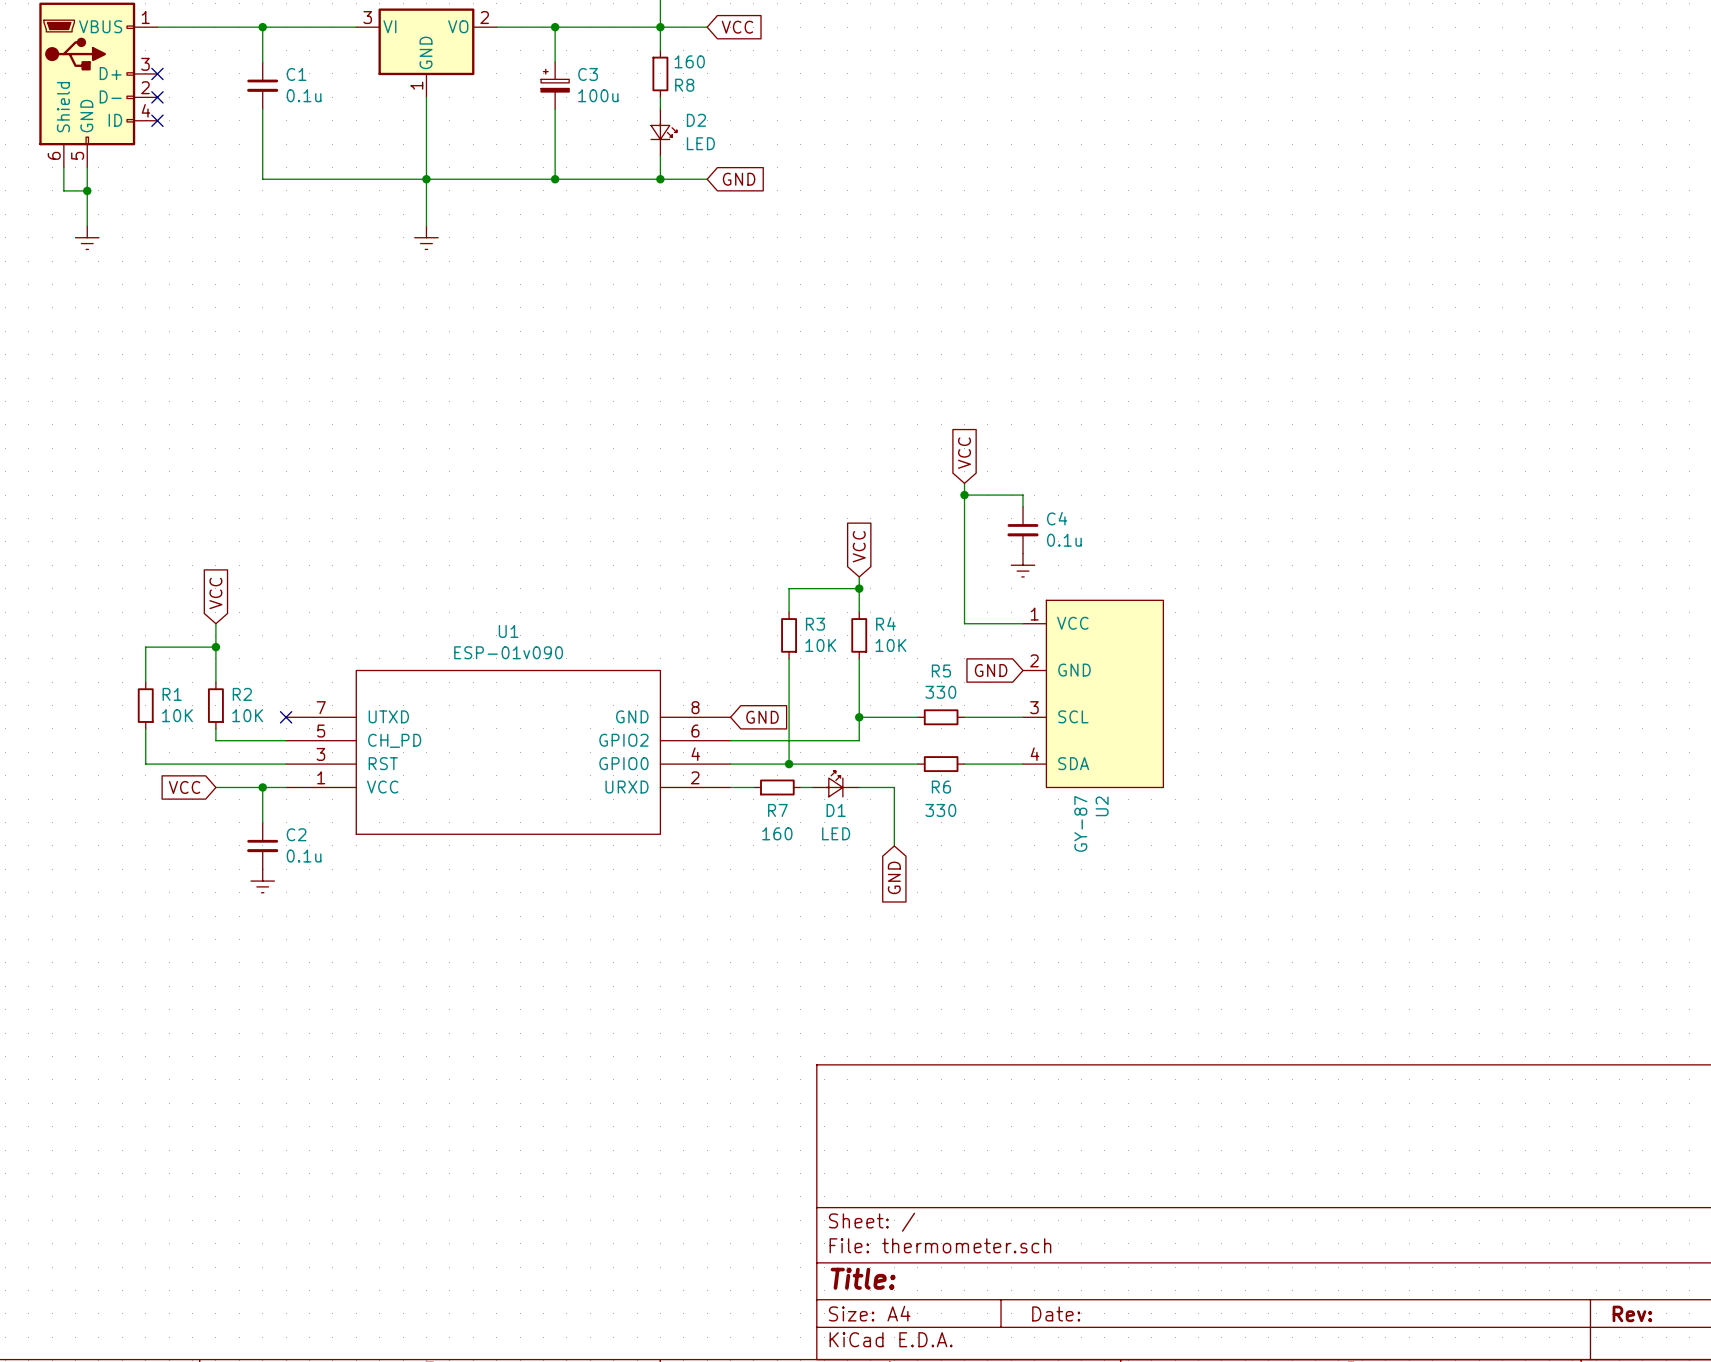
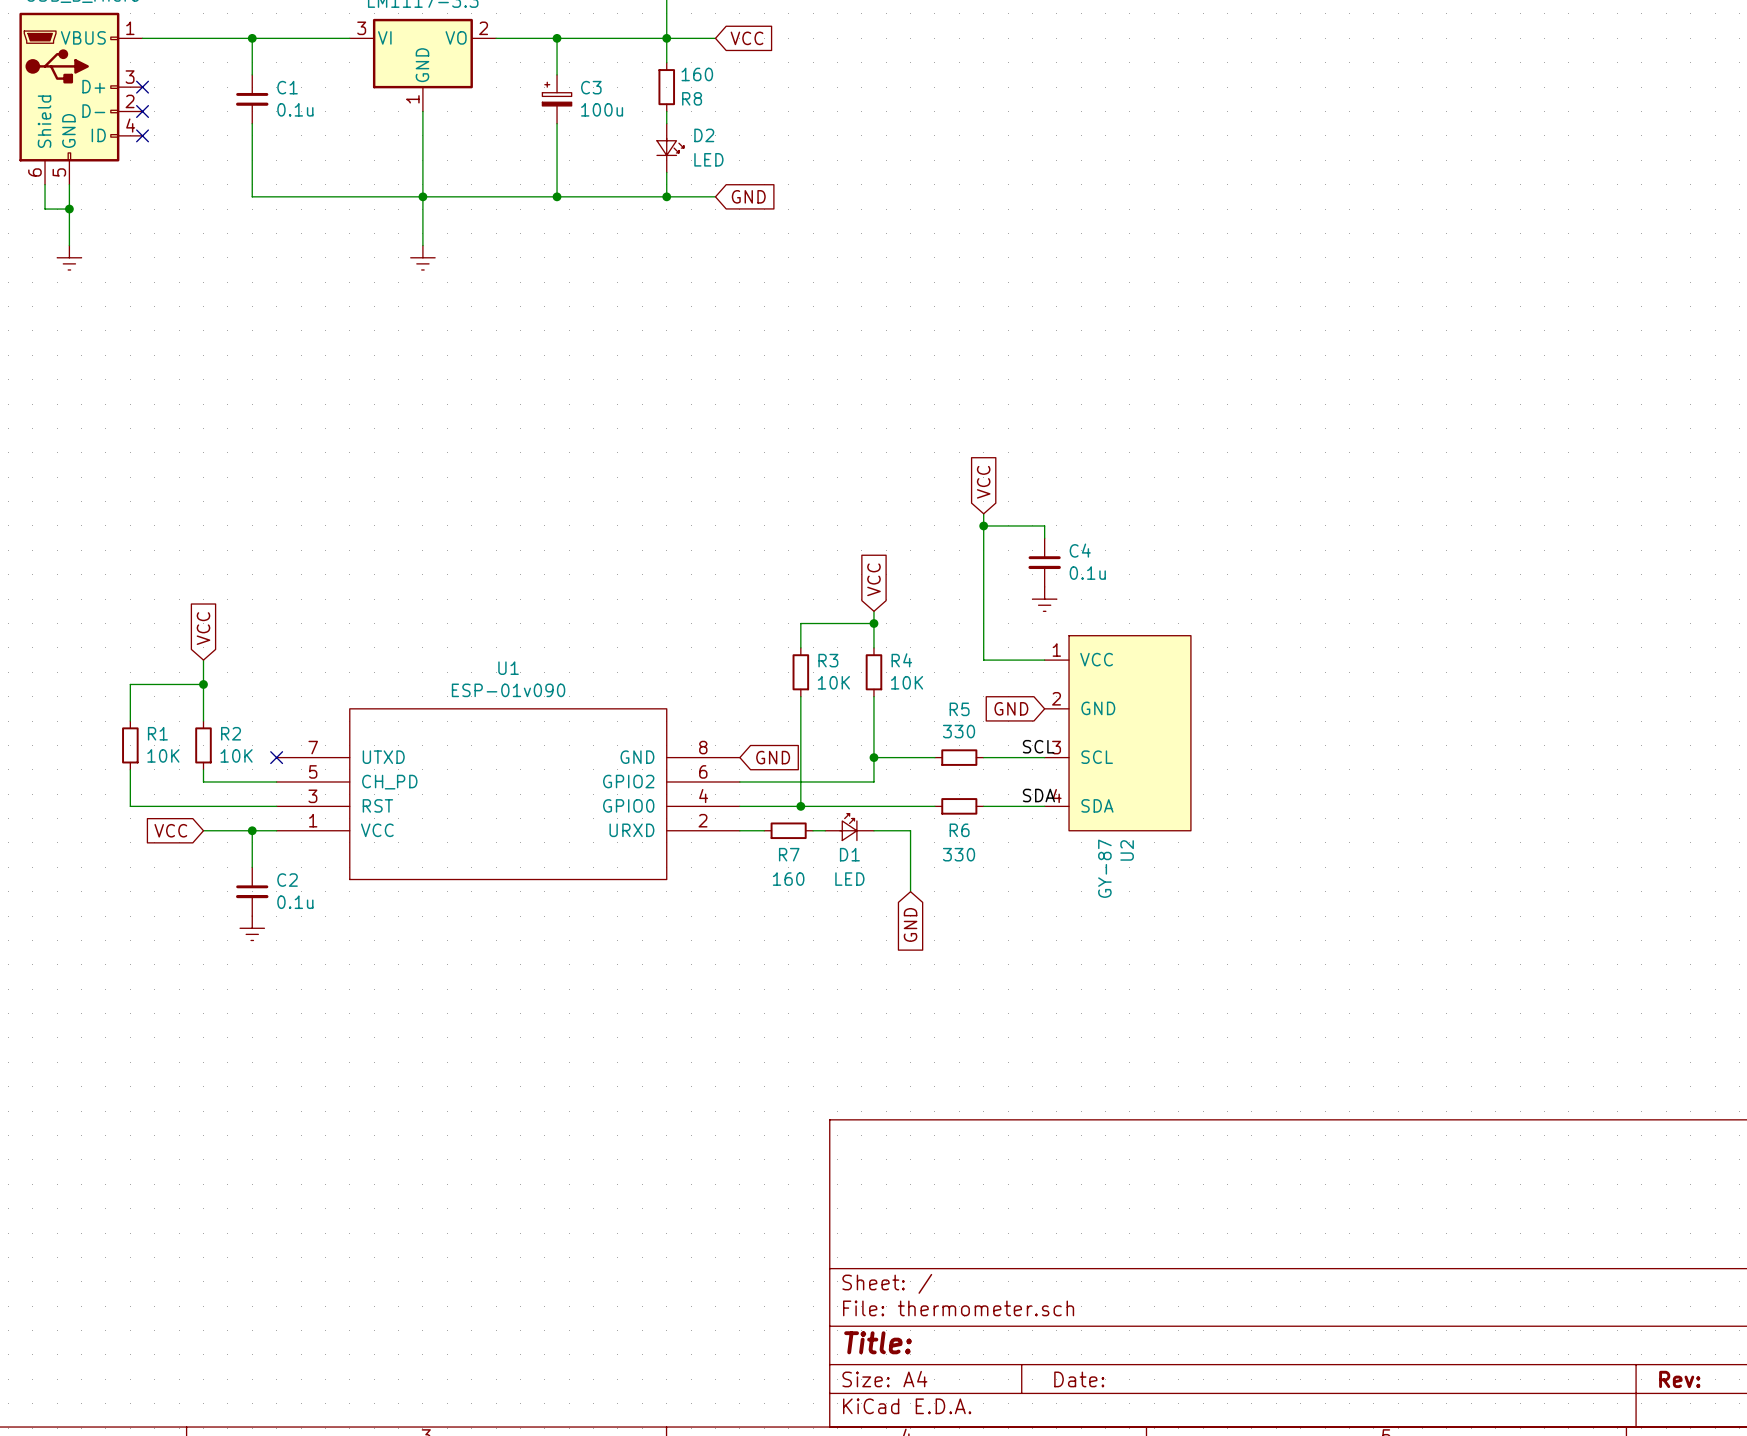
label: none -> SCL (1038, 746)
label: none -> SDA (1038, 795)

